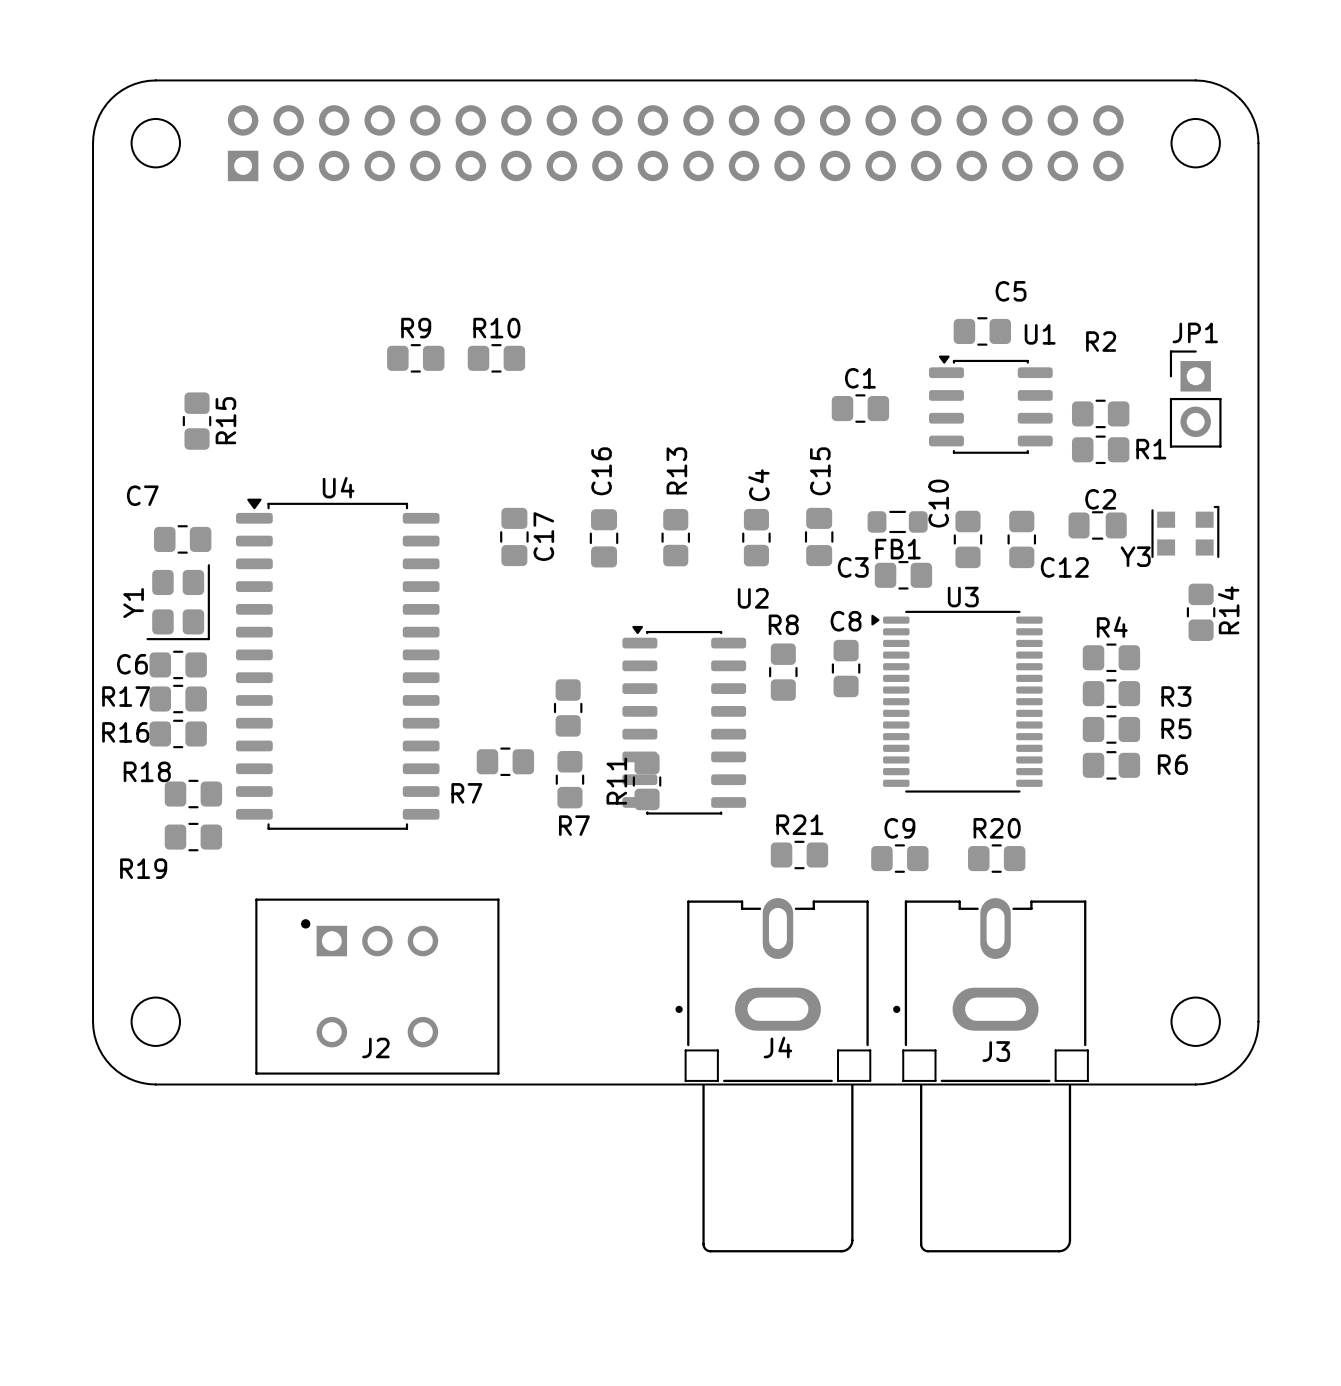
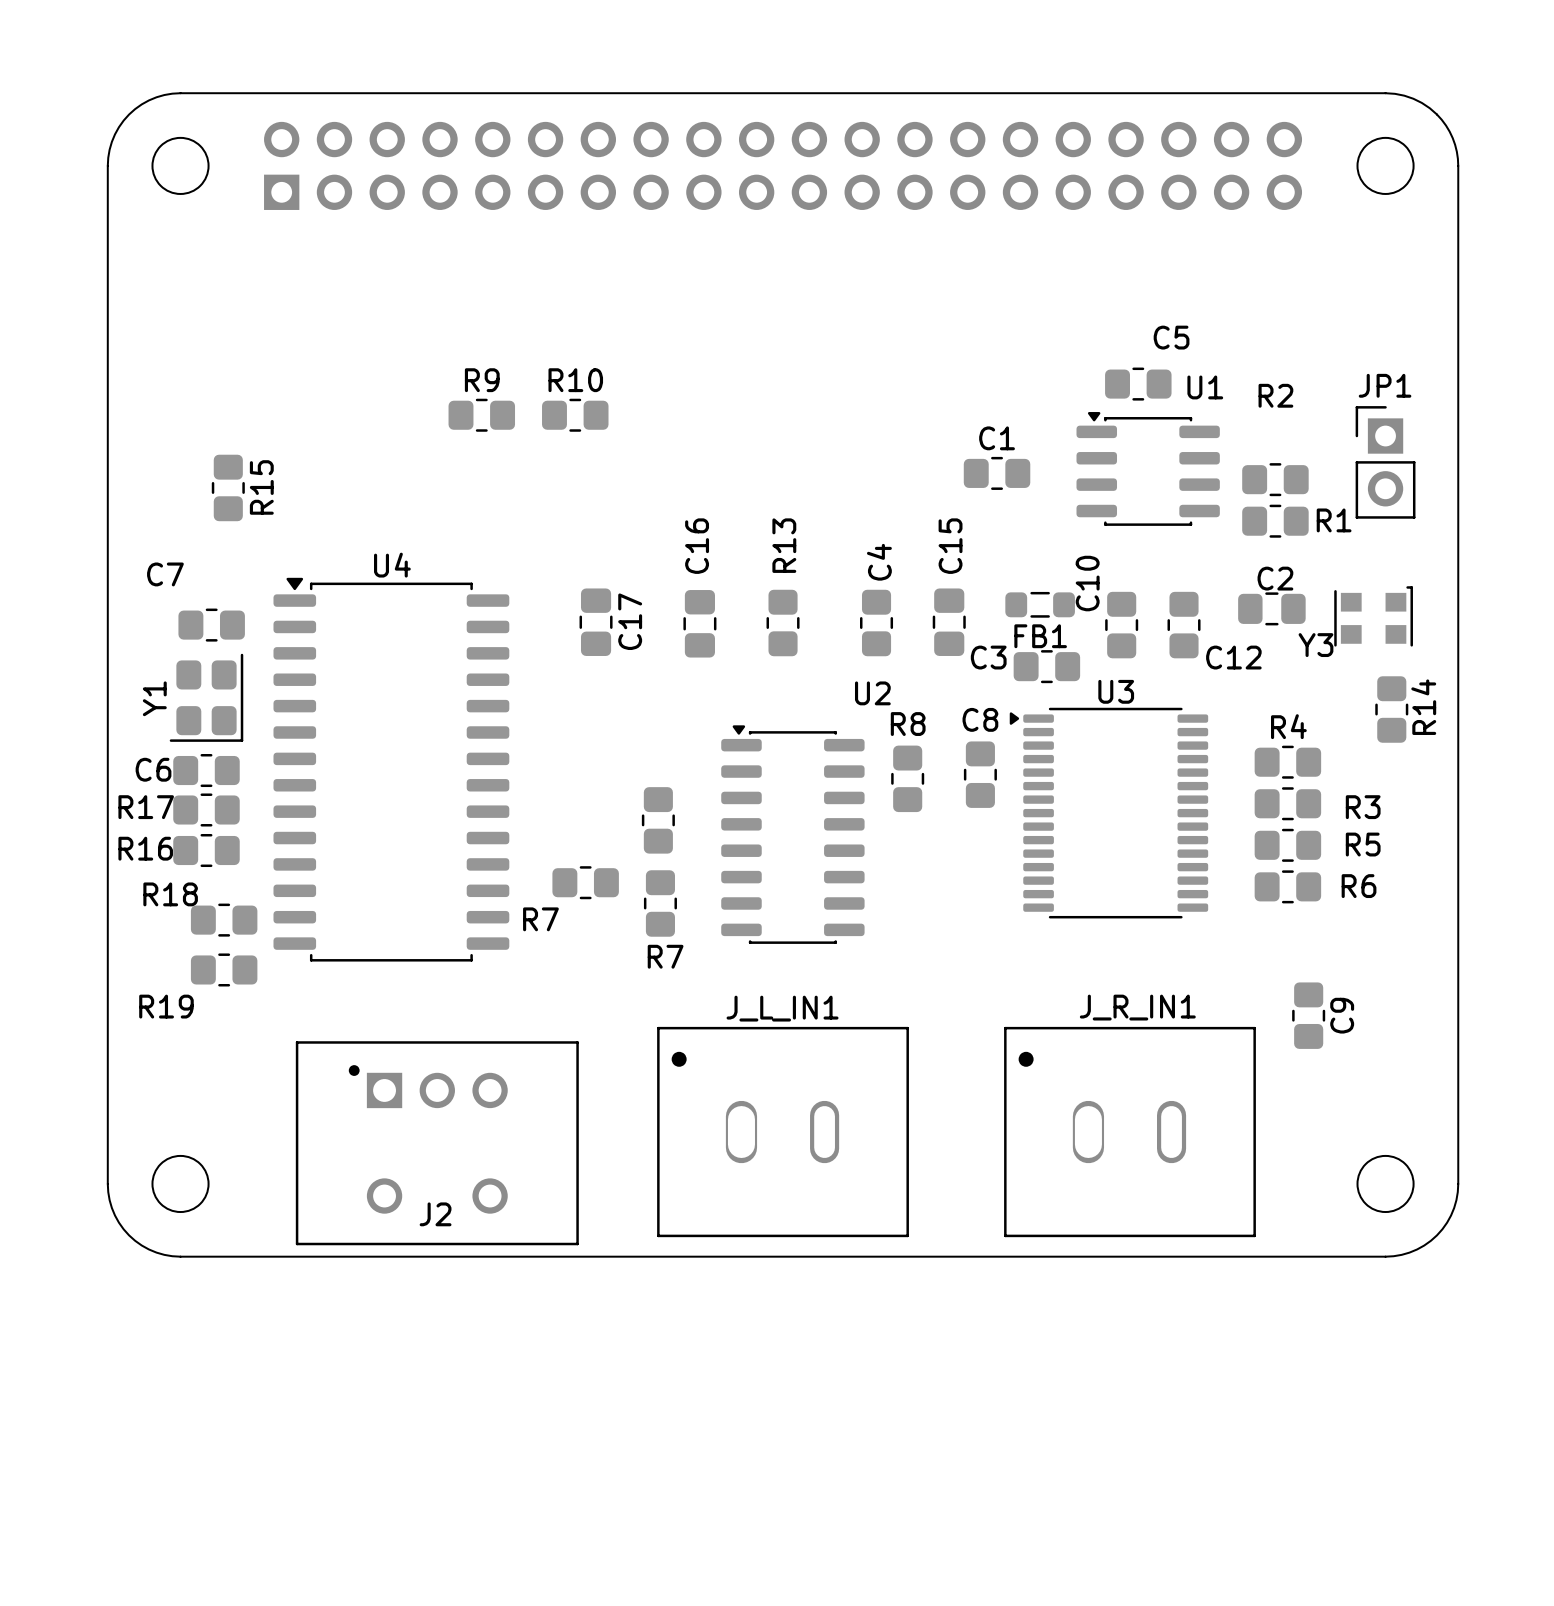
R11: (647, 781) -> none
R21: (799, 854) -> none
C9 rotation: 0° (899, 858) -> 90° clockwise (1308, 1015)
C9 position: (899, 858) -> (1308, 1015)
R20: (996, 858) -> none
J_L_IN1: none -> (783, 1132)
J_R_IN1: none -> (1129, 1132)
J4: (772, 1075) -> none
J3: (990, 1075) -> none

